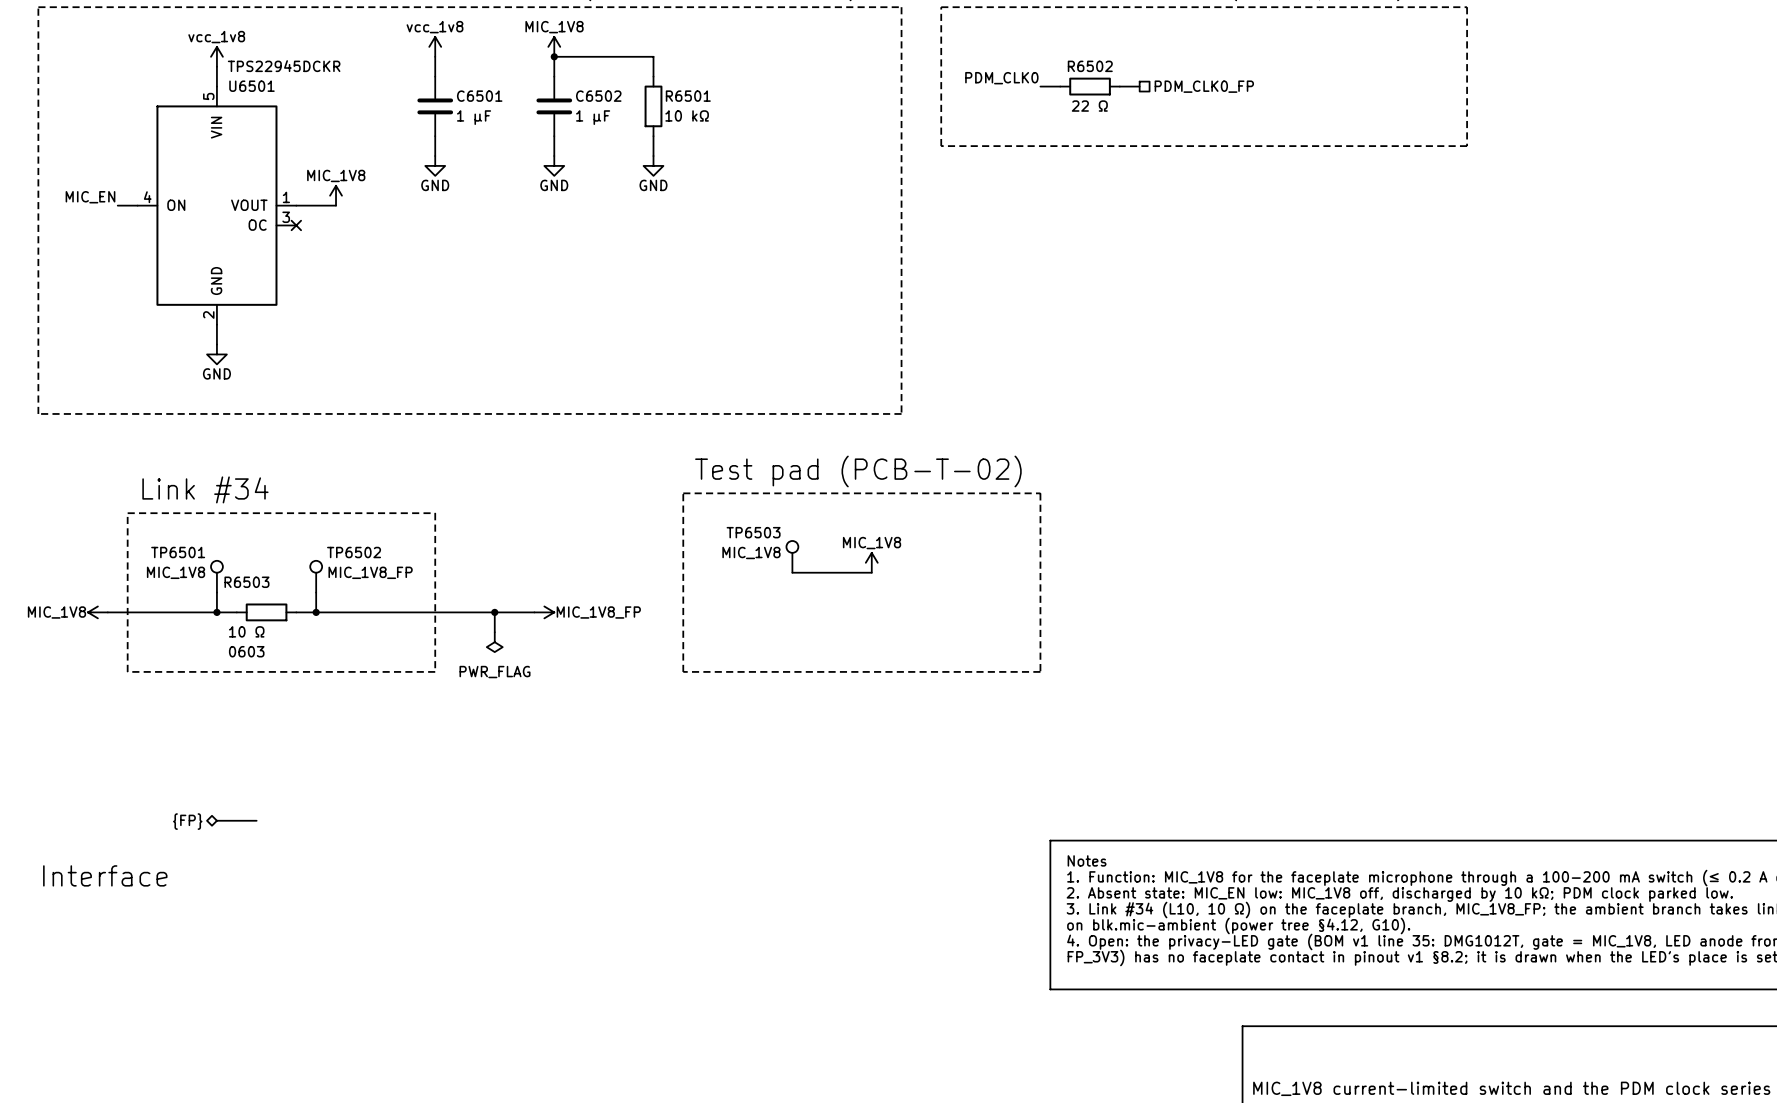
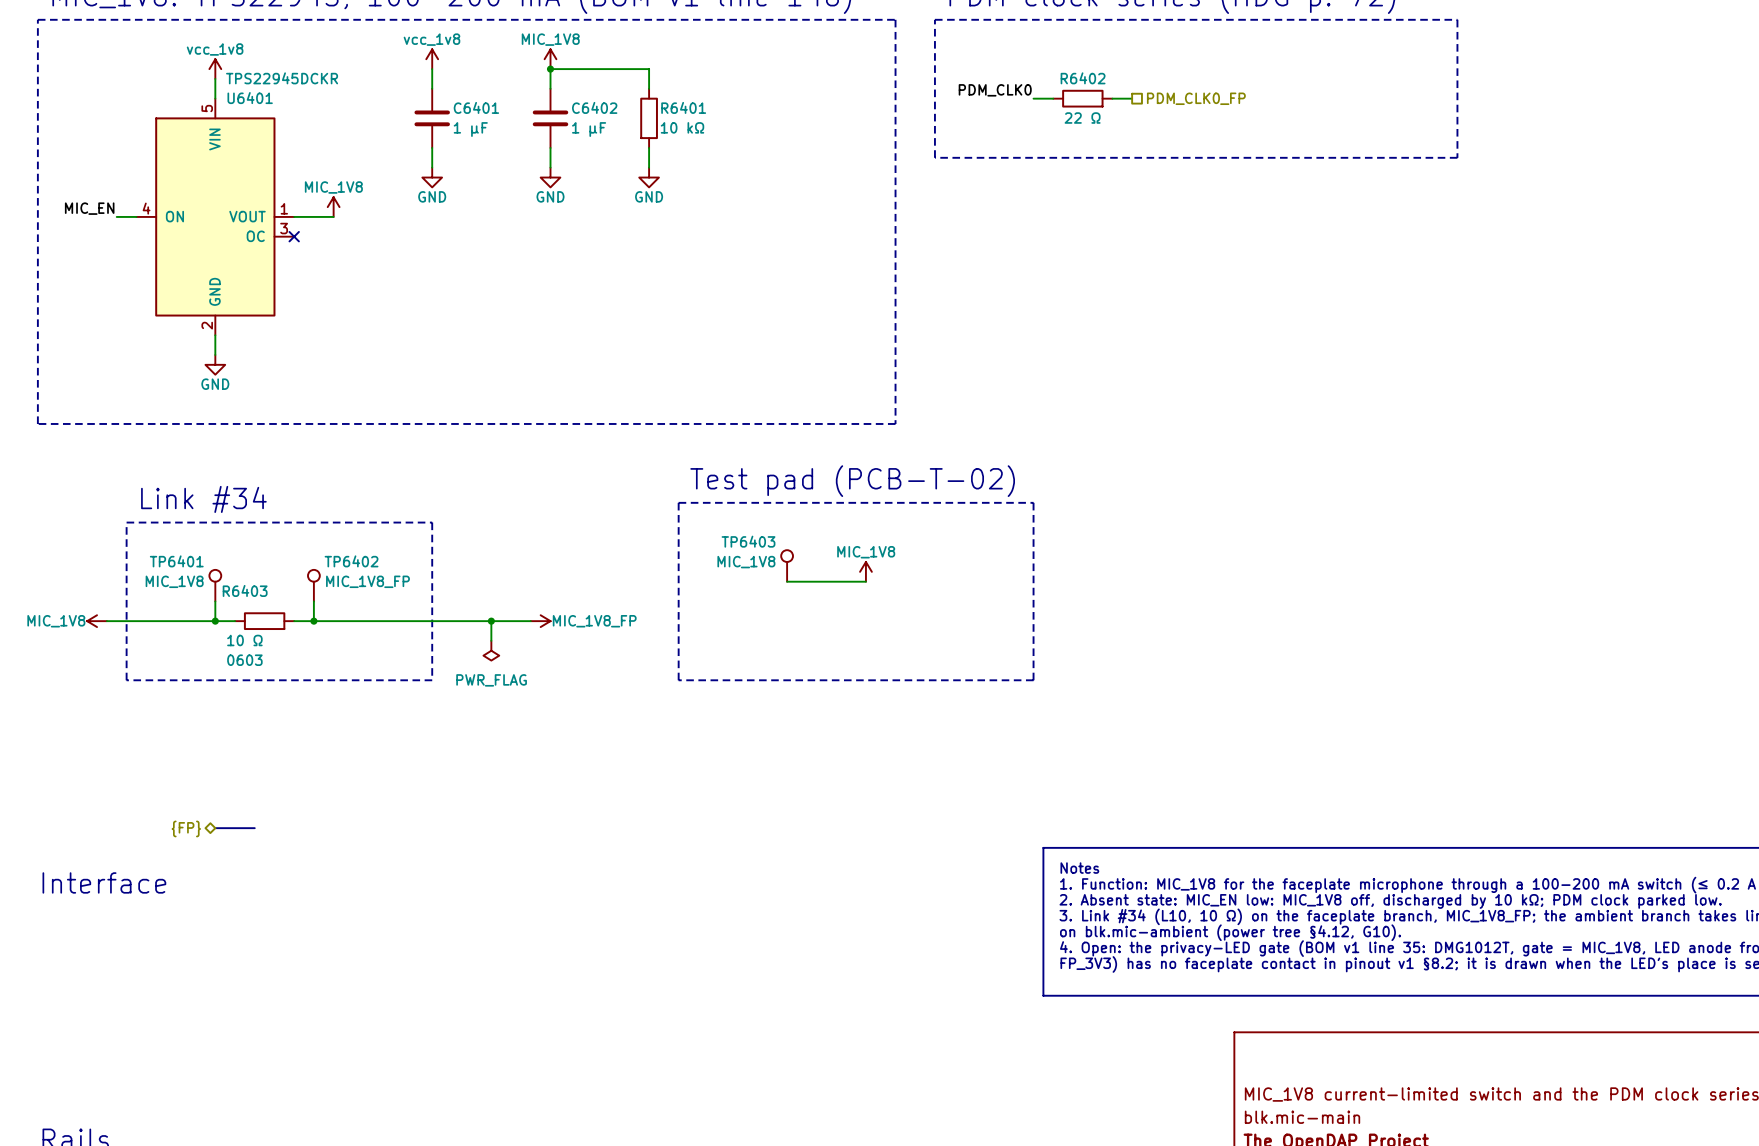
R6502 name: R6502 (1090, 66) -> R6402 (1083, 78)
U6501 name: U6501 (251, 86) -> U6401 (250, 98)
C6501 name: C6501 (479, 96) -> C6401 (476, 107)
C6502 name: C6502 (598, 96) -> C6402 (594, 107)
R6501 name: R6501 (688, 96) -> R6401 (683, 107)
TP6503 name: TP6503 (753, 532) -> TP6403 (748, 541)
TP6501 name: TP6501 (178, 552) -> TP6401 (176, 561)
TP6502 name: TP6502 (354, 552) -> TP6402 (351, 561)
R6503 name: R6503 (246, 582) -> R6403 (245, 590)

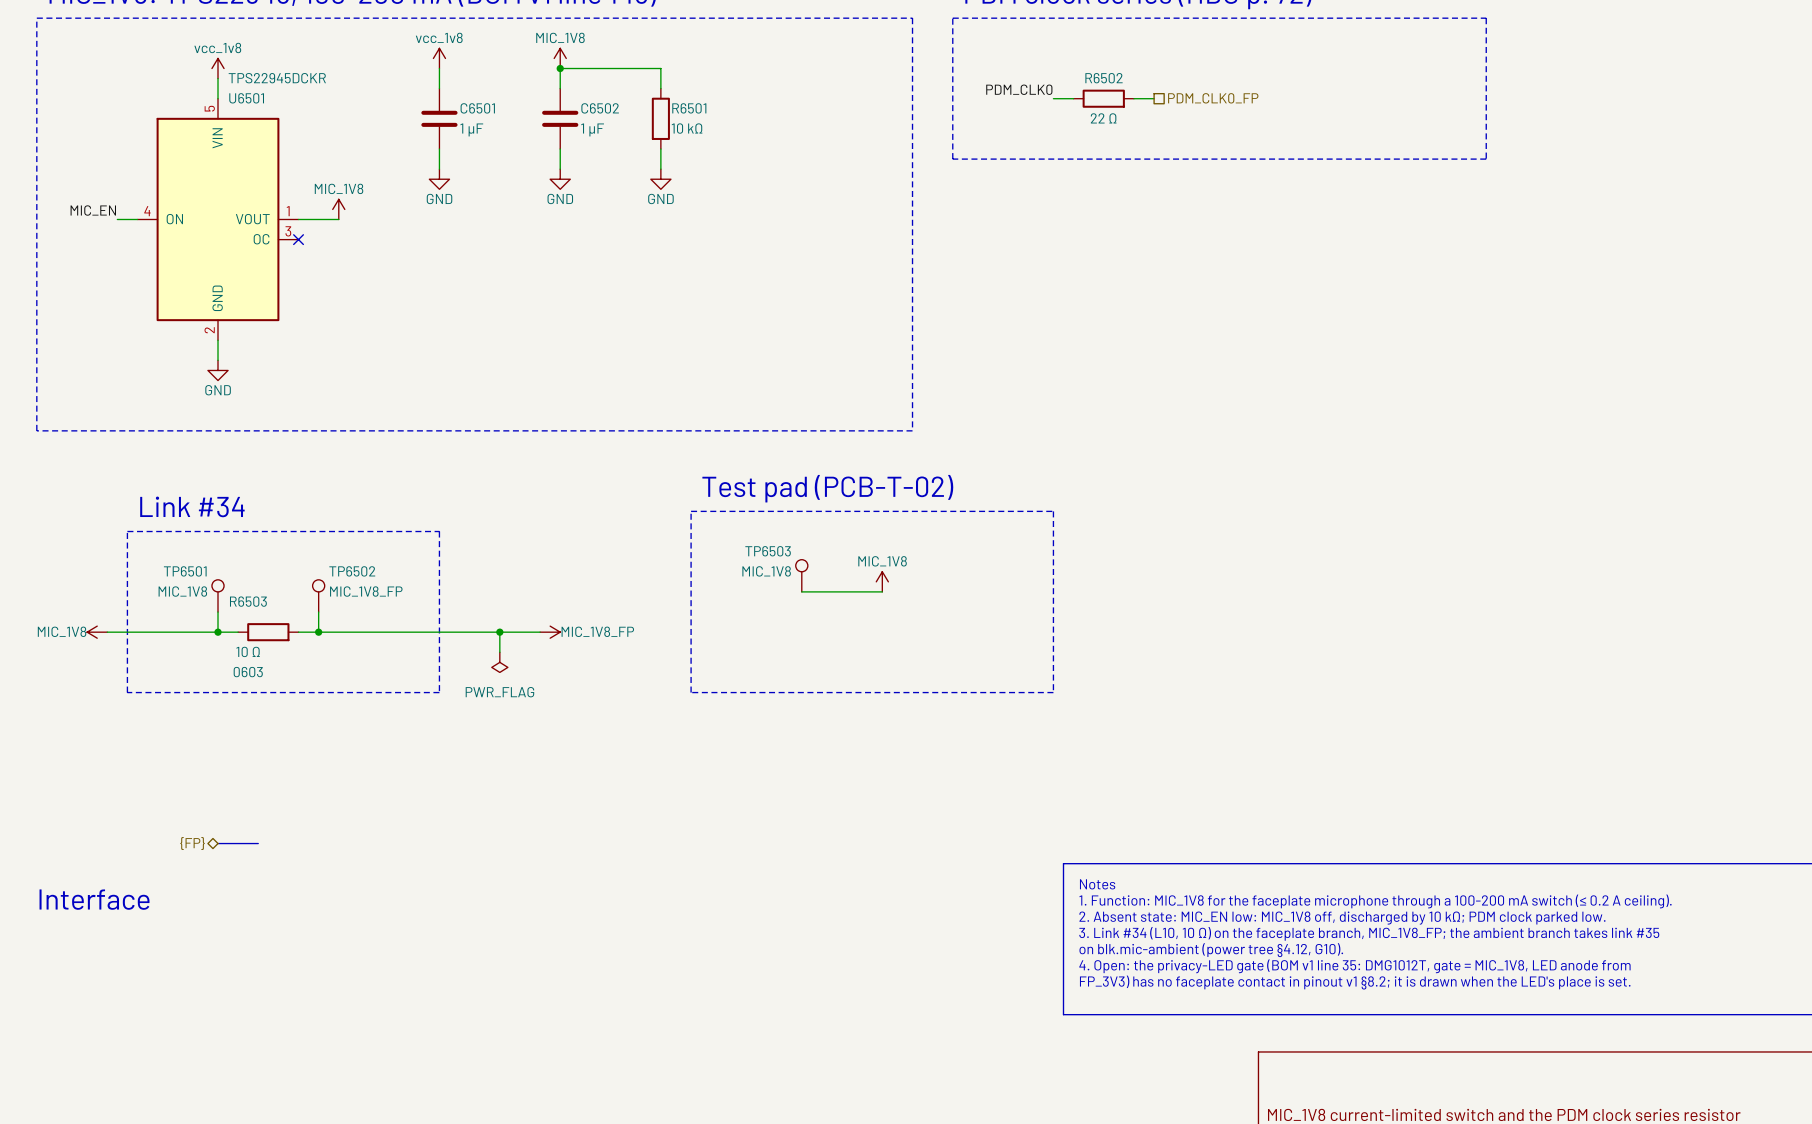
R6402 name: R6402 (1083, 78) -> R6502 (1104, 78)
U6401 name: U6401 (250, 98) -> U6501 (246, 98)
C6401 name: C6401 (476, 107) -> C6501 (477, 108)
C6402 name: C6402 (594, 107) -> C6502 (600, 108)
R6401 name: R6401 (683, 107) -> R6501 (689, 108)
TP6403 name: TP6403 (748, 541) -> TP6503 (768, 551)
TP6401 name: TP6401 (176, 561) -> TP6501 (185, 571)
TP6402 name: TP6402 (351, 561) -> TP6502 (352, 571)
R6403 name: R6403 (245, 590) -> R6503 (248, 601)

